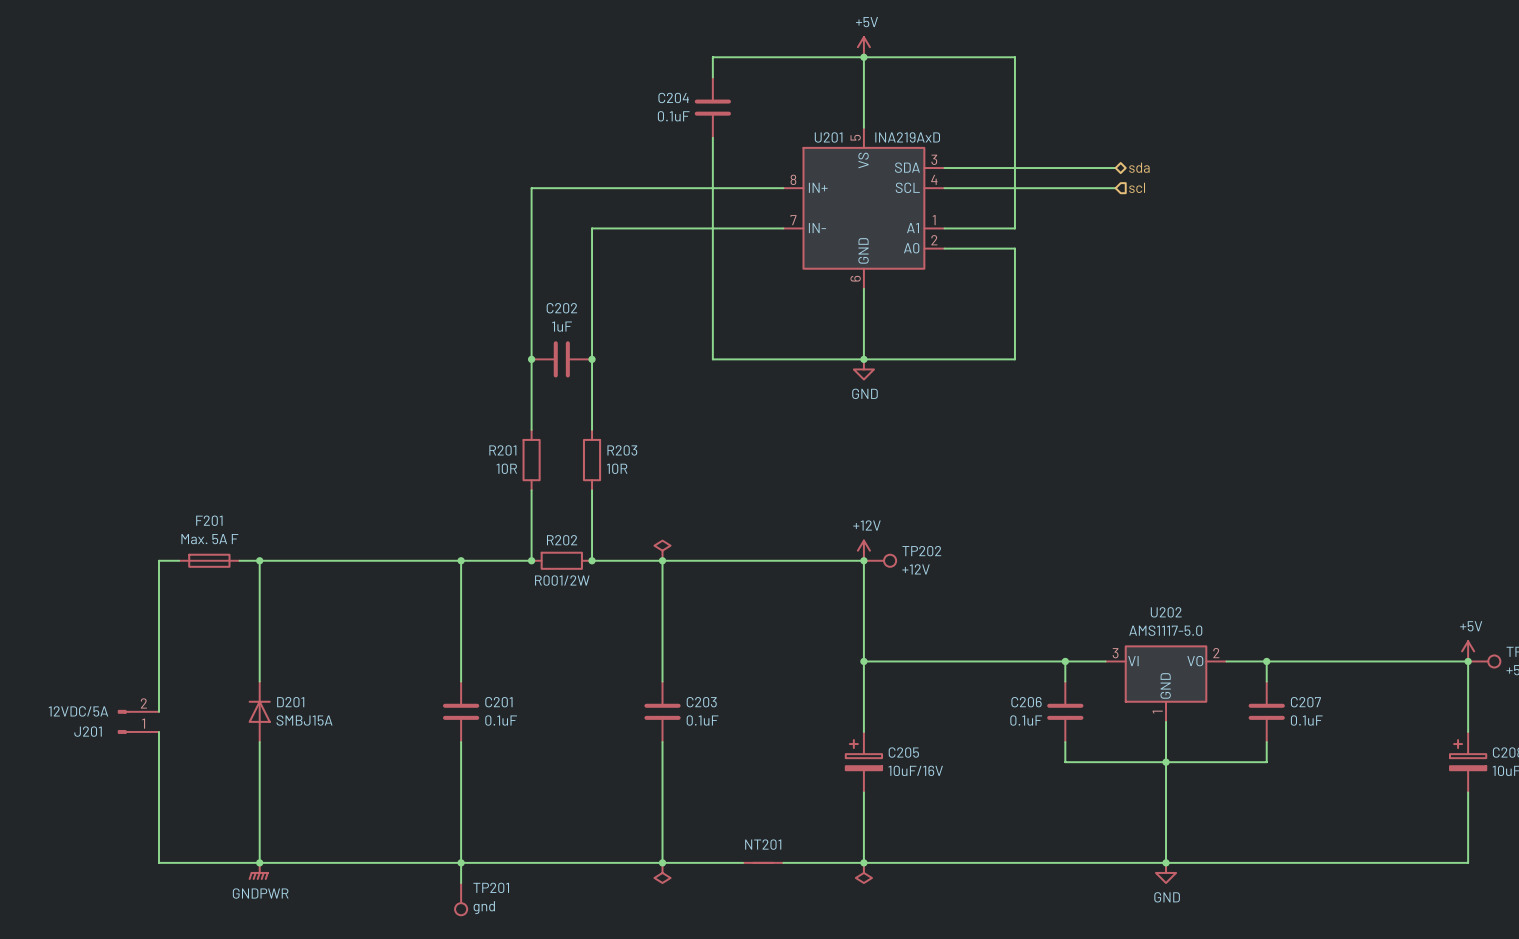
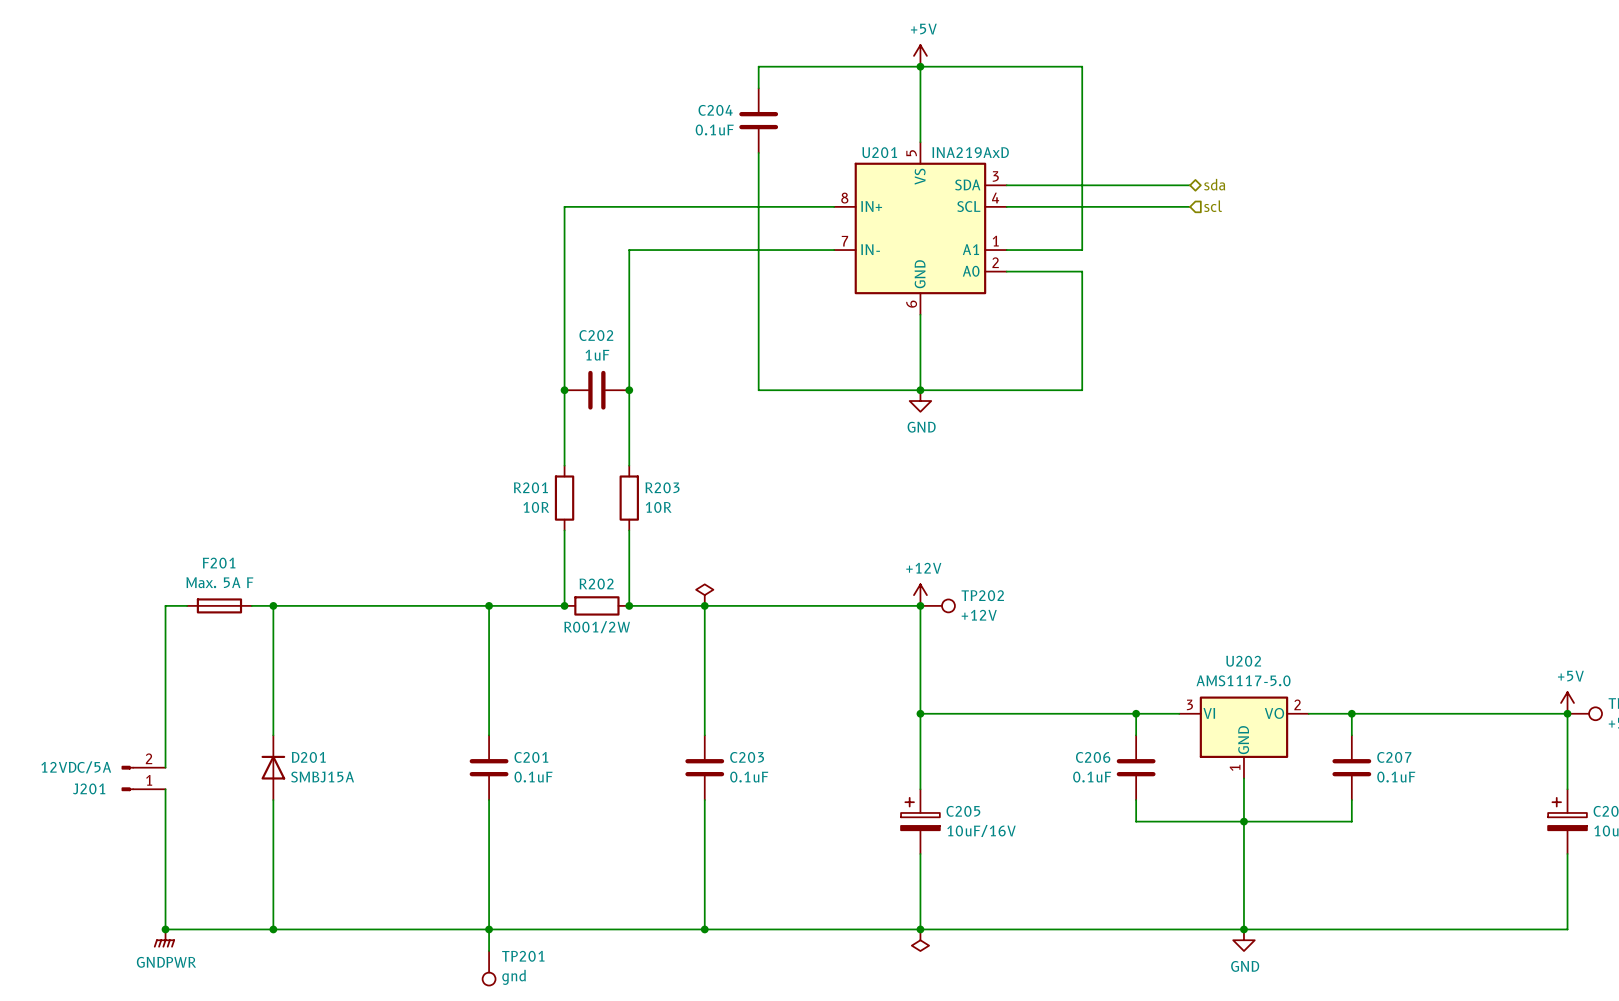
junction: none -> (165, 929)
NT201: (763, 862) -> none
power symbol position: GNDPWR (258, 871) -> GNDPWR (164, 938)
power symbol: (662, 872) -> none

